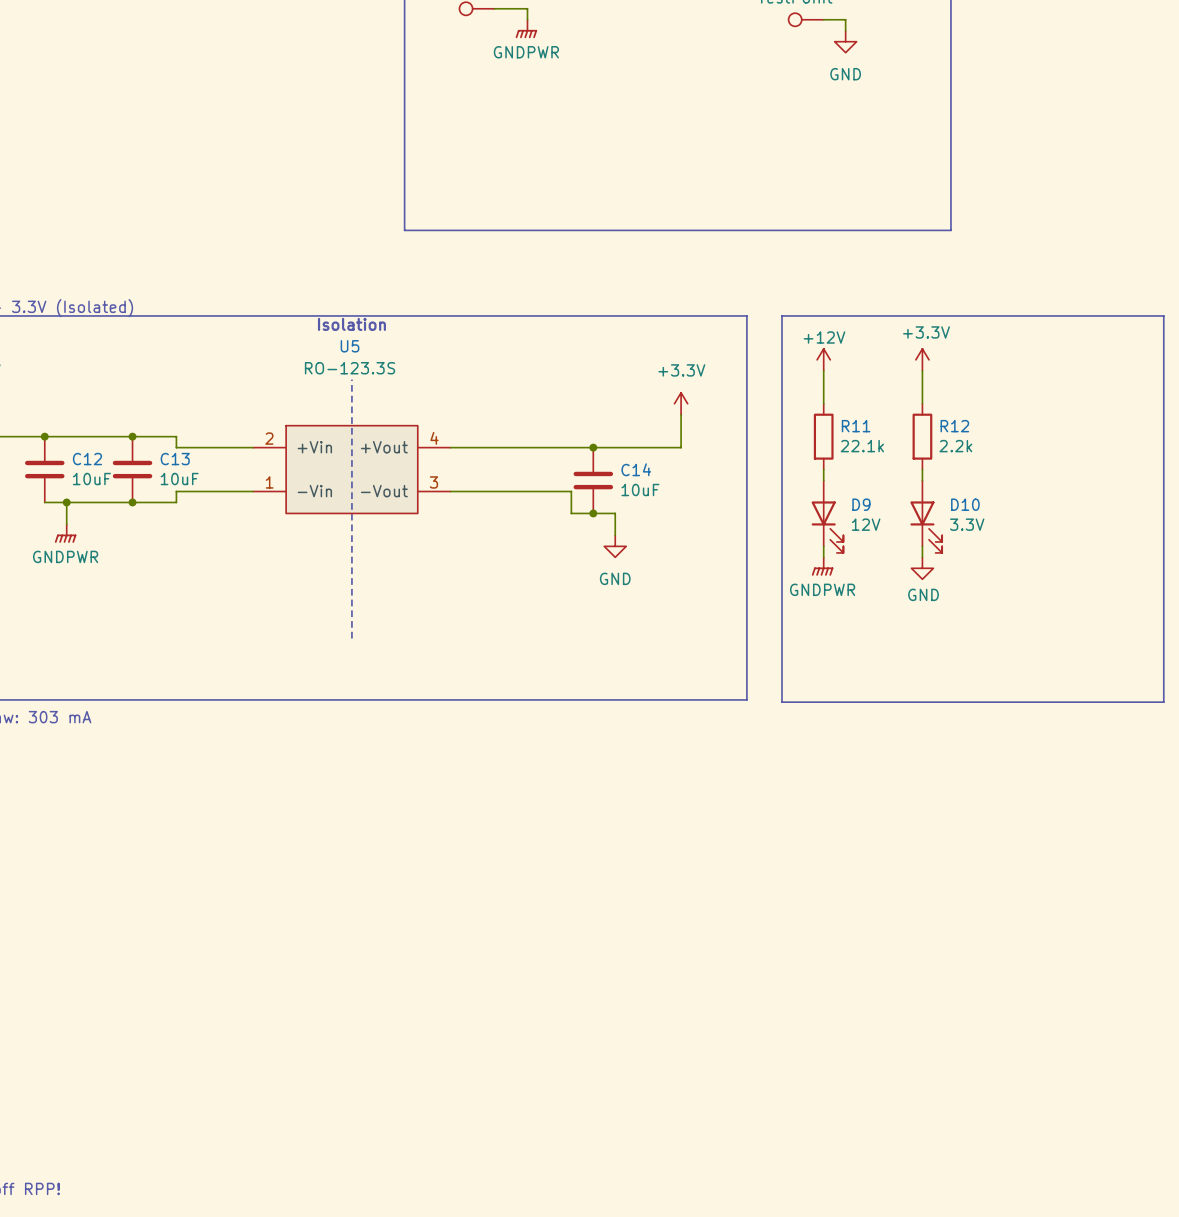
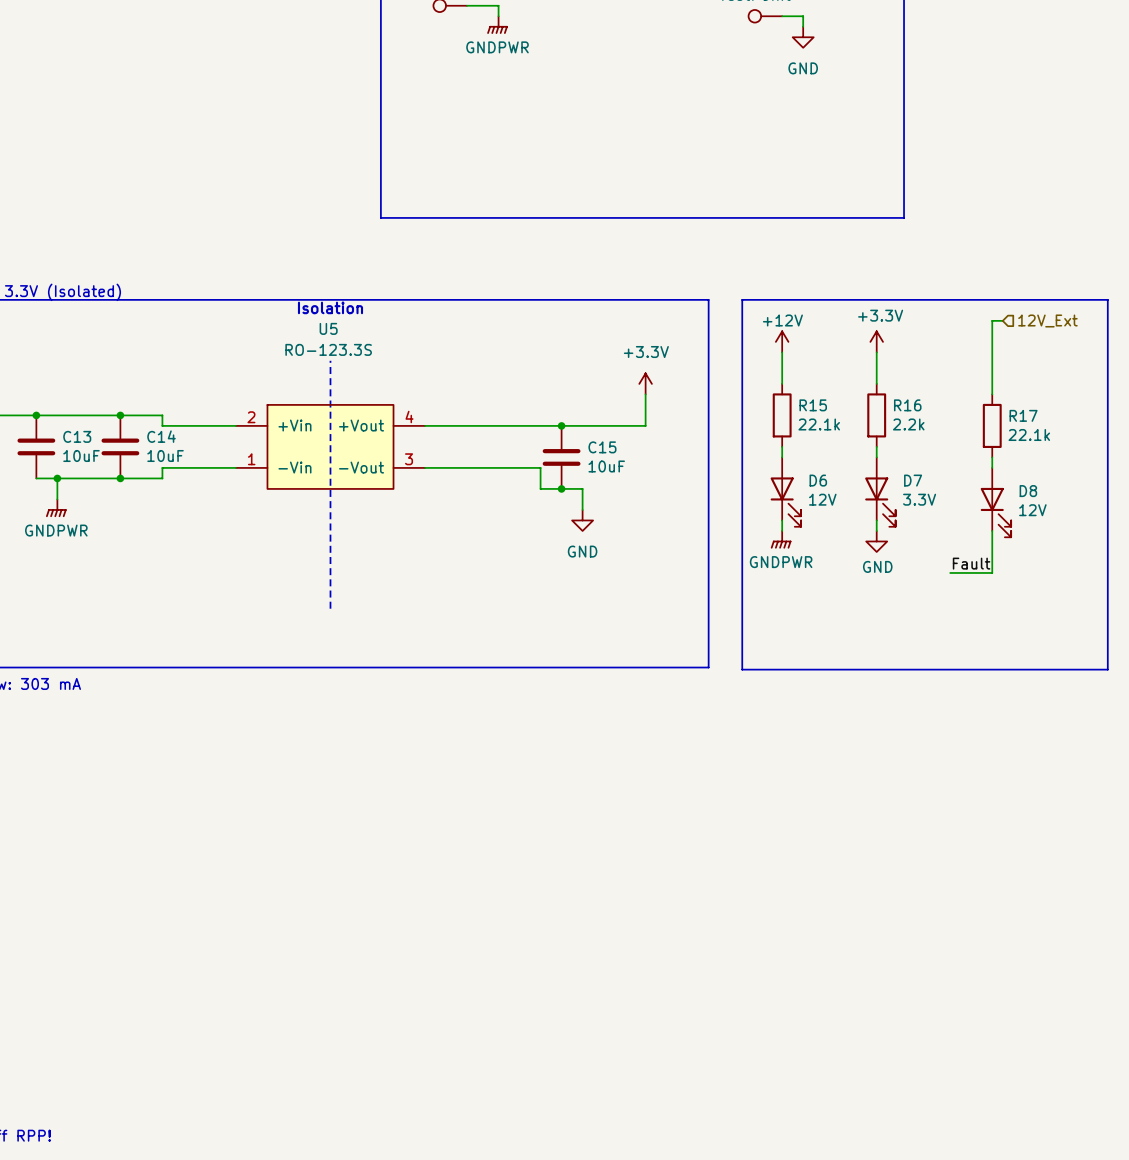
wire: none -> (1002, 320) (992, 320) (992, 394)
hierarchical label: none -> 12V_Ext (1047, 320)
R11 name: R11 (856, 426) -> R15 (813, 405)
R12 name: R12 (954, 426) -> R16 (907, 405)
R17: none -> 22.1k (992, 425)
C12 name: C12 (87, 459) -> C13 (77, 436)
C13 name: C13 (175, 459) -> C14 (161, 436)
C14 name: C14 (636, 469) -> C15 (602, 447)
wire: none -> (992, 457) (992, 467)
D9 name: D9 (861, 504) -> D6 (818, 480)
D10 name: D10 (965, 504) -> D7 (913, 480)
D8: none -> 12V (995, 502)
wire: none -> (992, 530) (992, 572) (950, 572)
label: none -> Fault (971, 563)

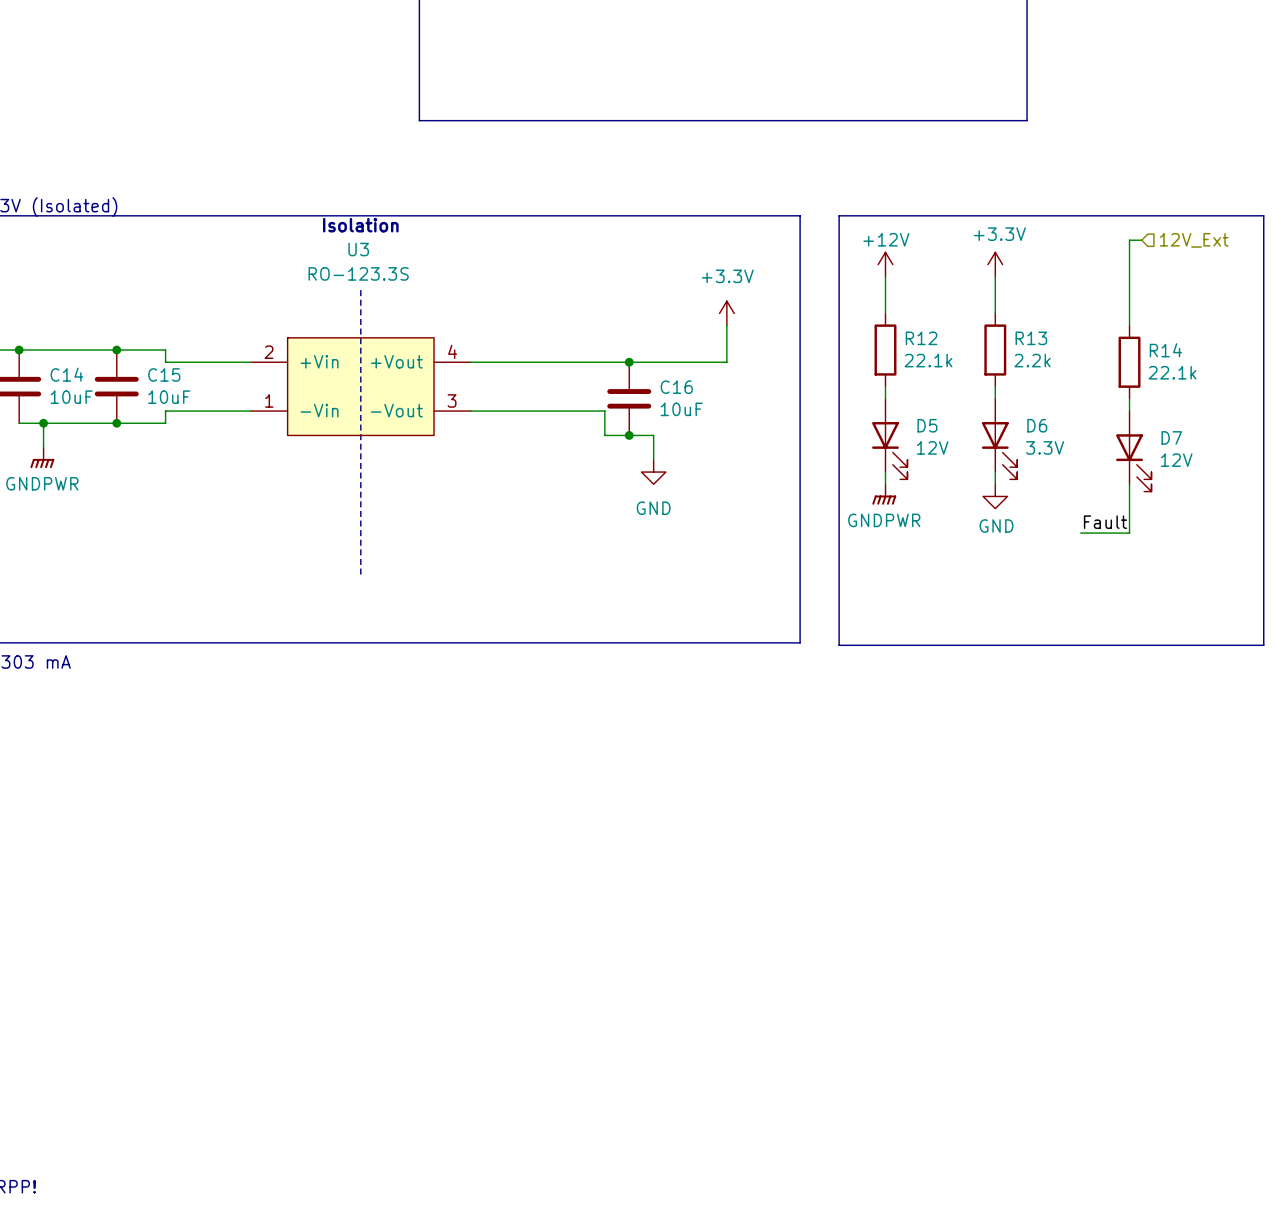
U5 name: U5 (328, 328) -> U3 (358, 249)
R15 name: R15 (813, 405) -> R12 (921, 338)
R16 name: R16 (907, 405) -> R13 (1031, 338)
R17 name: R17 (1023, 415) -> R14 (1165, 350)
C13 name: C13 (77, 436) -> C14 (66, 374)
C14 name: C14 (161, 436) -> C15 (164, 374)
C15 name: C15 (602, 447) -> C16 (676, 387)
D6 name: D6 (818, 480) -> D5 (927, 425)
D7 name: D7 (913, 480) -> D6 (1037, 425)
D8 name: D8 (1028, 491) -> D7 (1171, 437)

